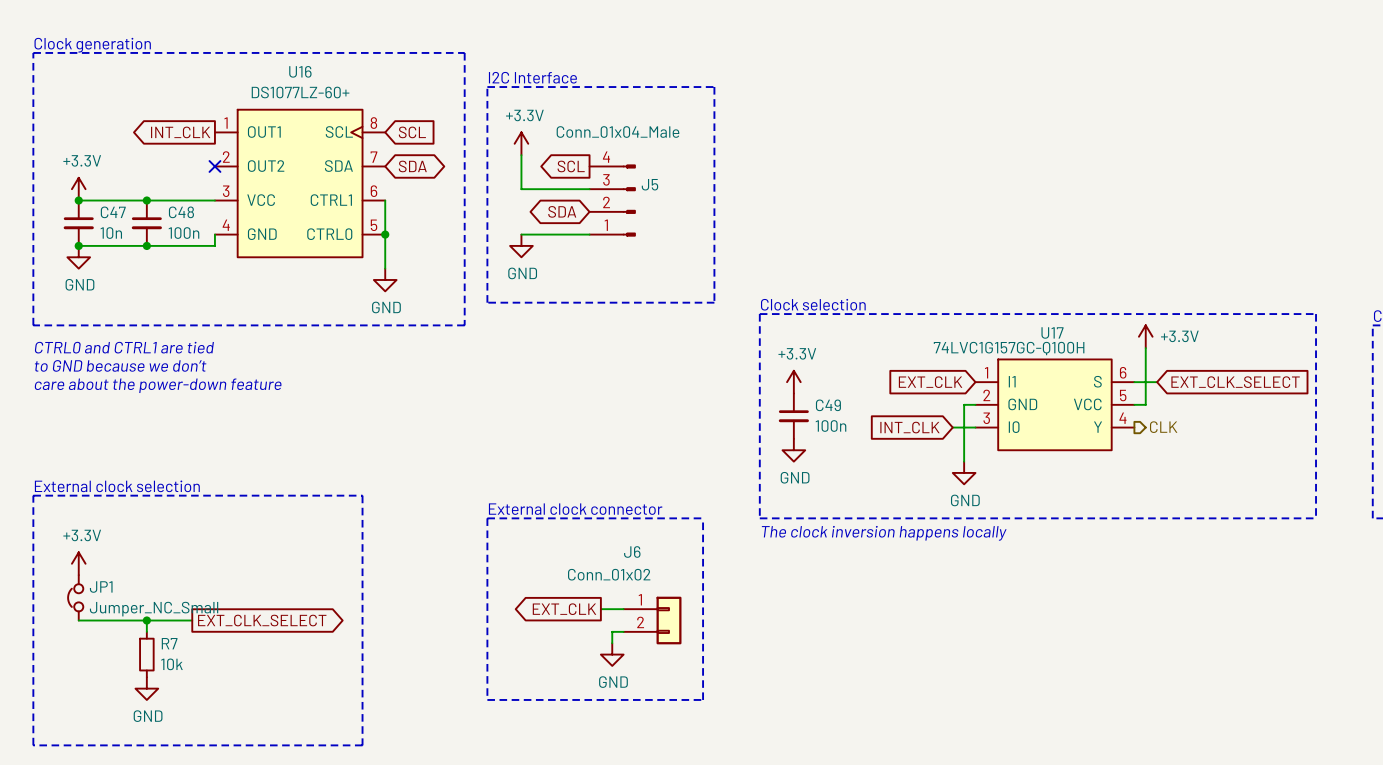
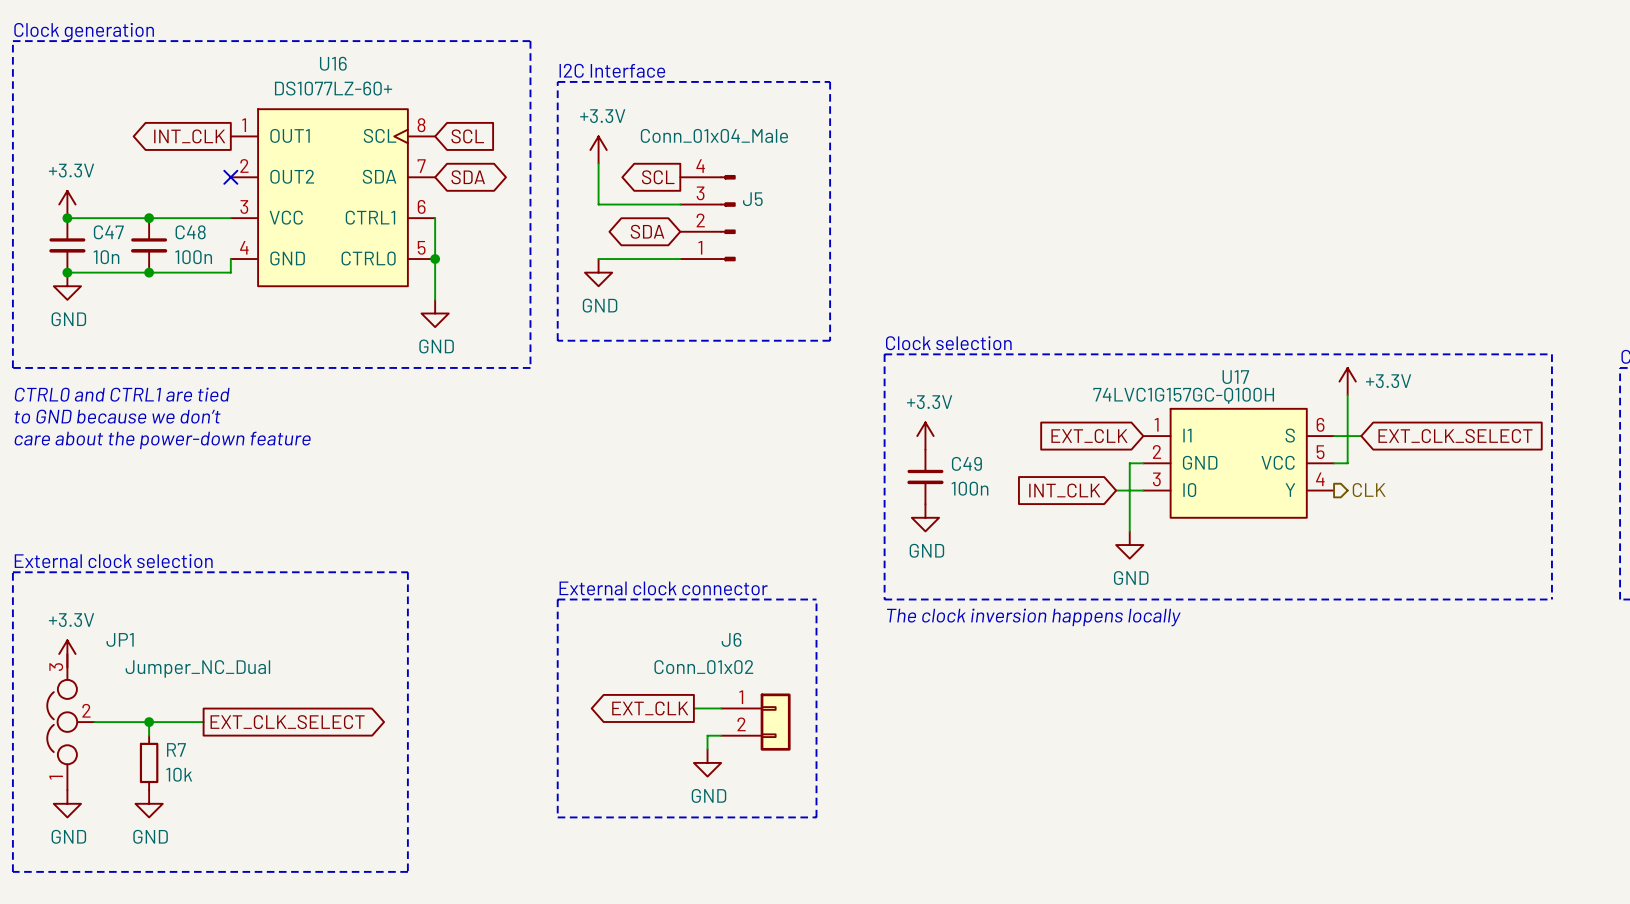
JP1 symbol: [68, 575, 84, 621] -> [47, 653, 95, 791]
JP1 name position: JP1 (101, 587) -> JP1 (120, 639)
JP1 value: Jumper_NC_Small (154, 609) -> Jumper_NC_Dual (197, 668)
power symbol: none -> GND (67, 803)

